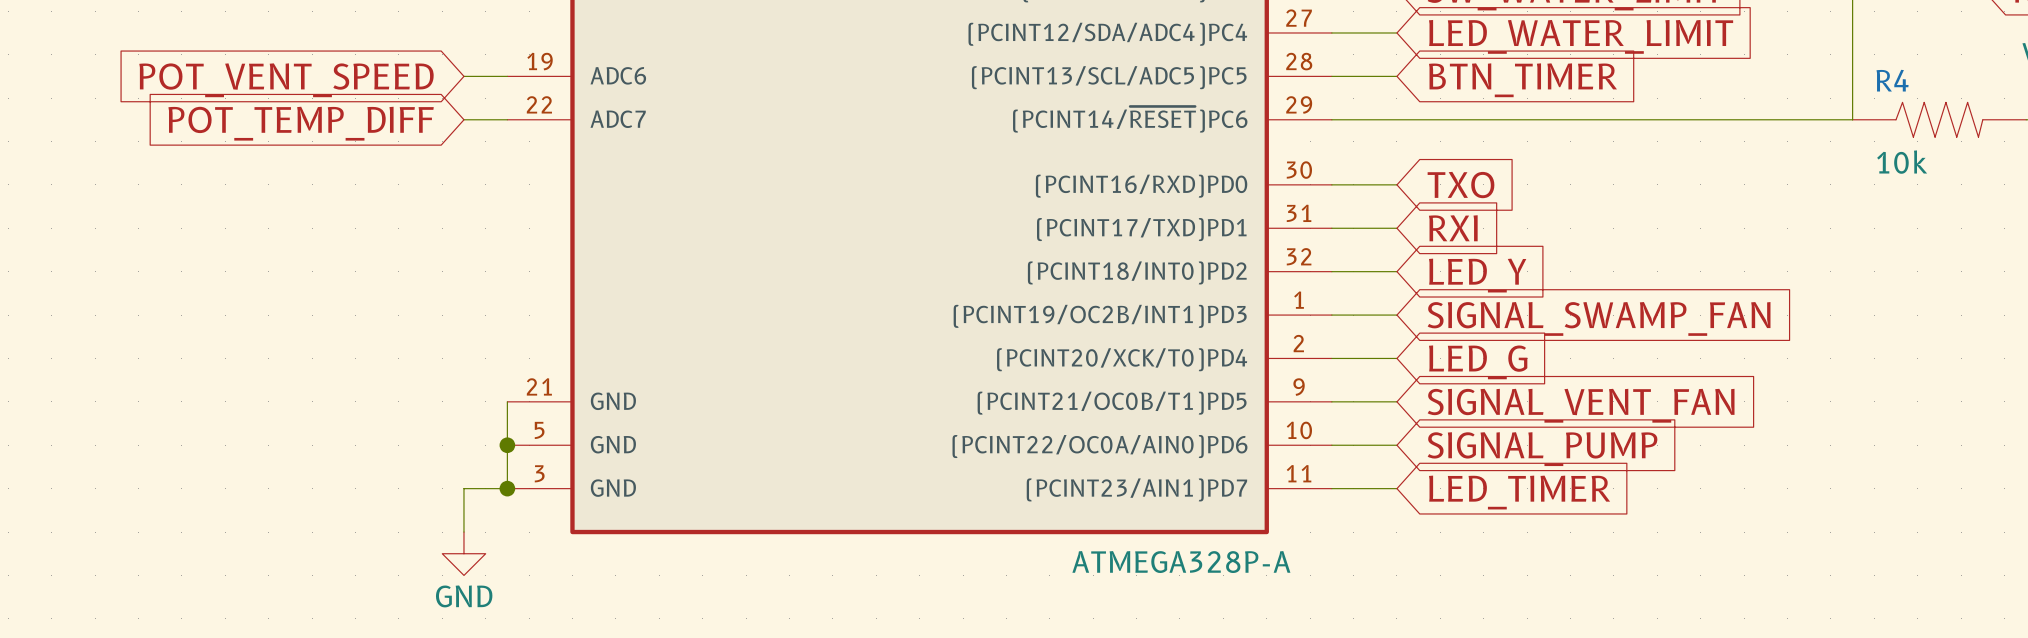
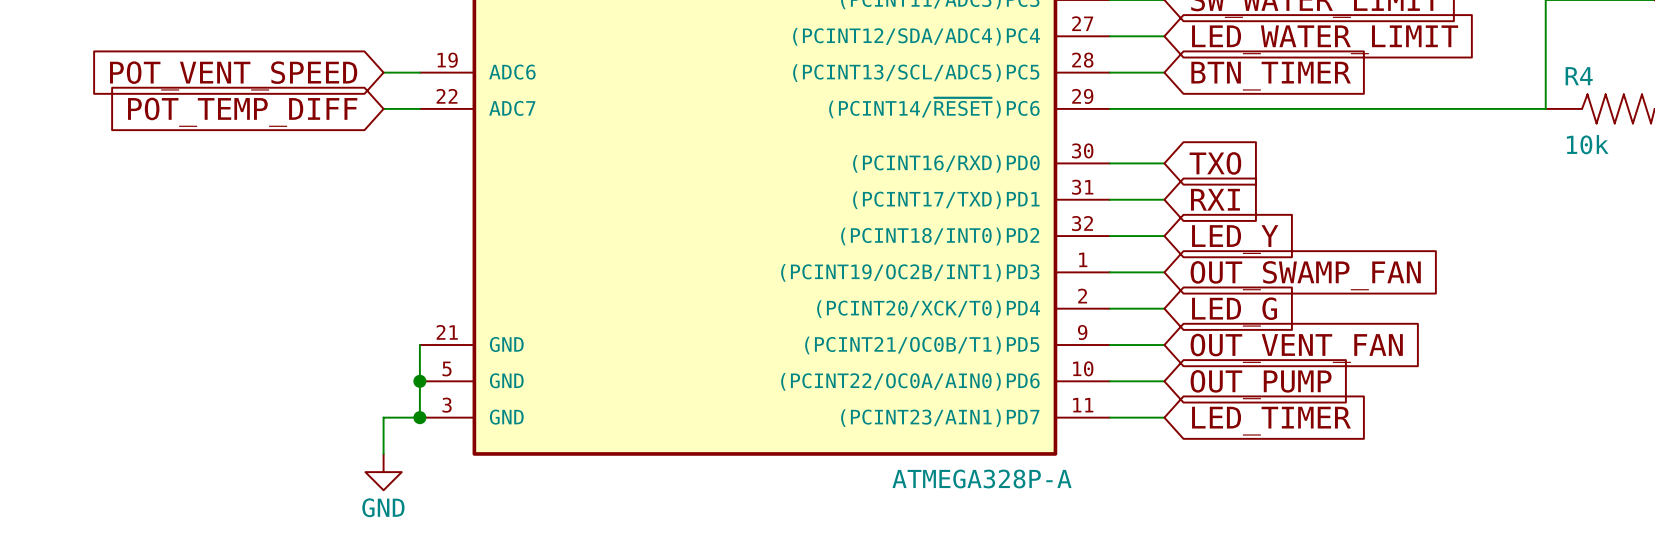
global label: SIGNAL_SWAMP_FAN (1599, 318) -> OUT_SWAMP_FAN (1305, 275)
global label: SIGNAL_VENT_FAN (1581, 405) -> OUT_VENT_FAN (1296, 348)
global label: SIGNAL_PUMP (1542, 449) -> OUT_PUMP (1261, 384)

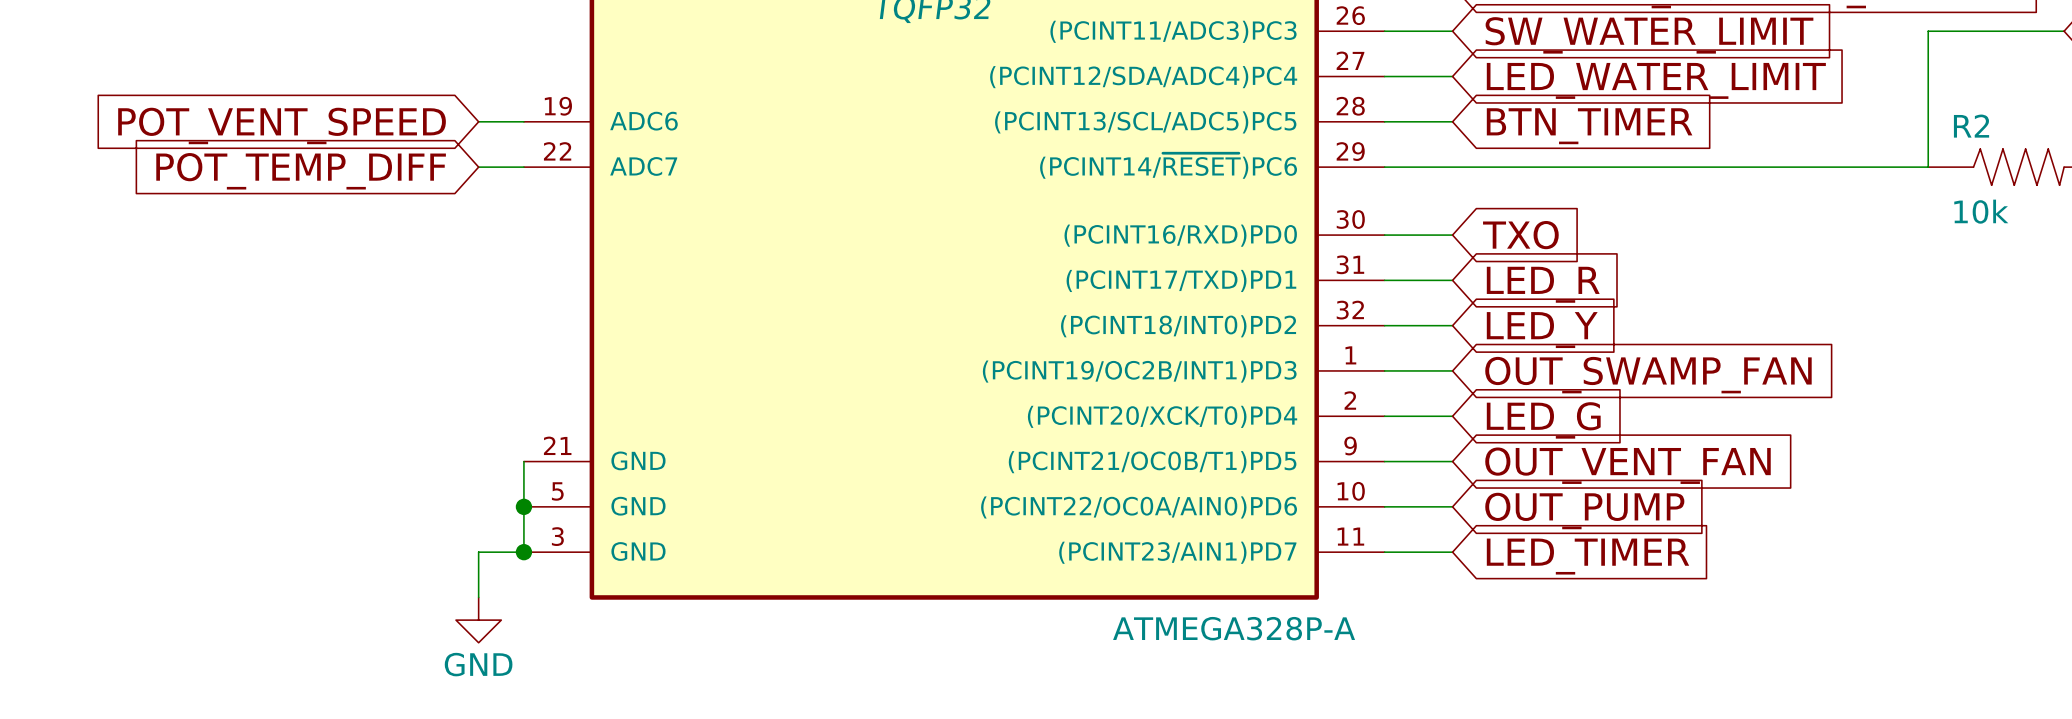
R4 name: R4 (1579, 76) -> R2 (1971, 126)
global label: RXI (1215, 199) -> LED_R (1543, 284)

